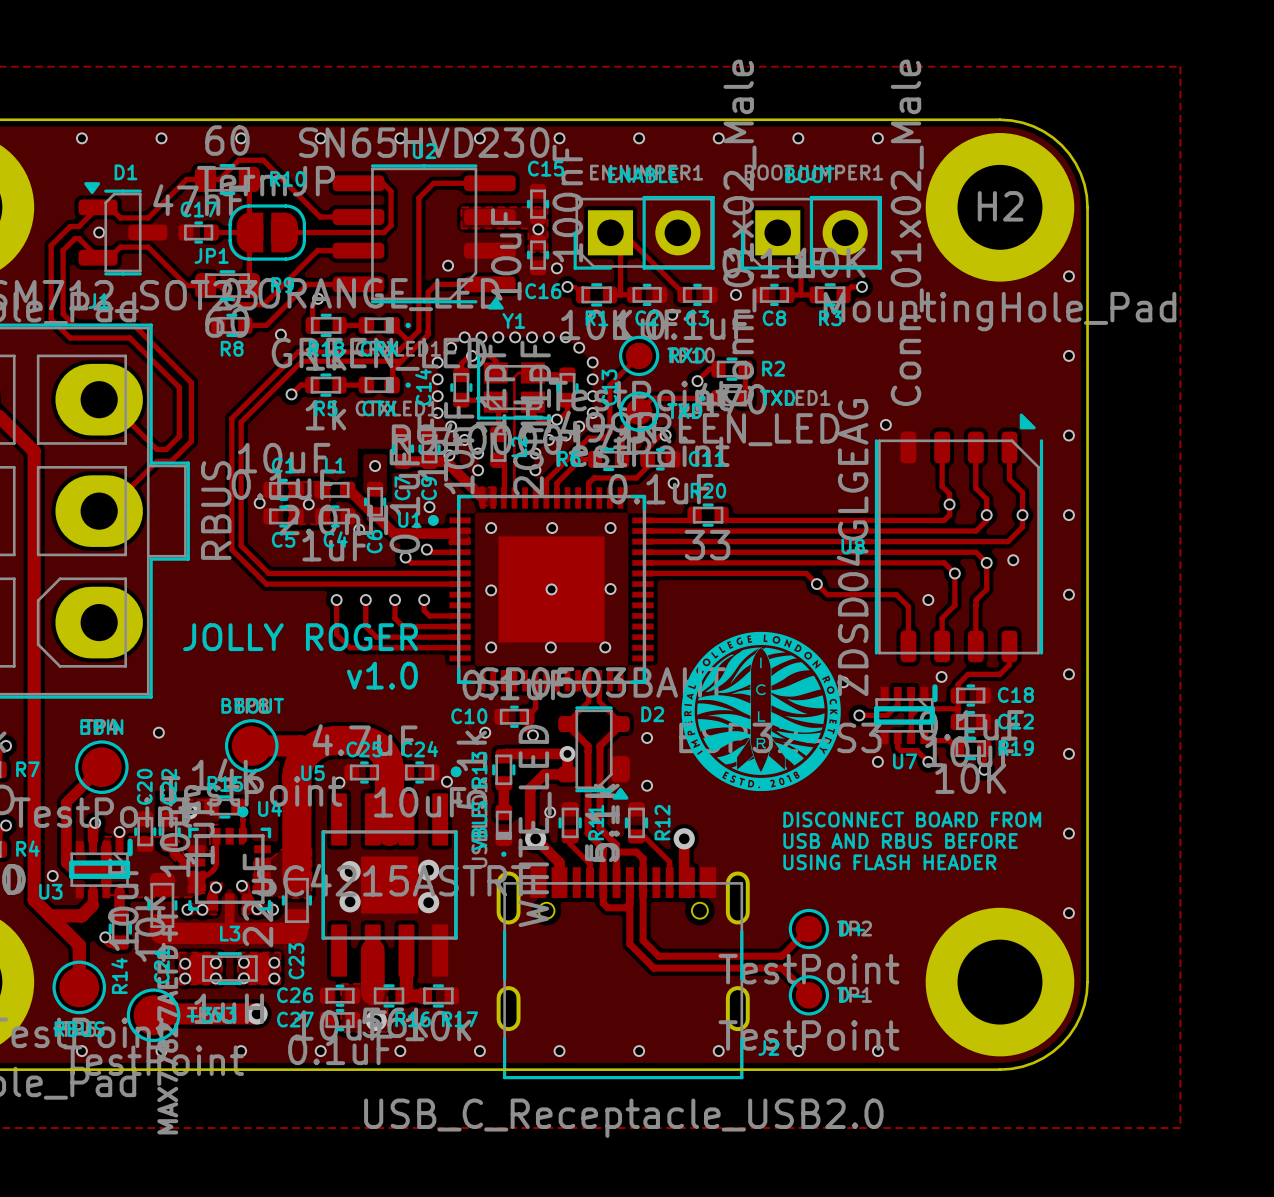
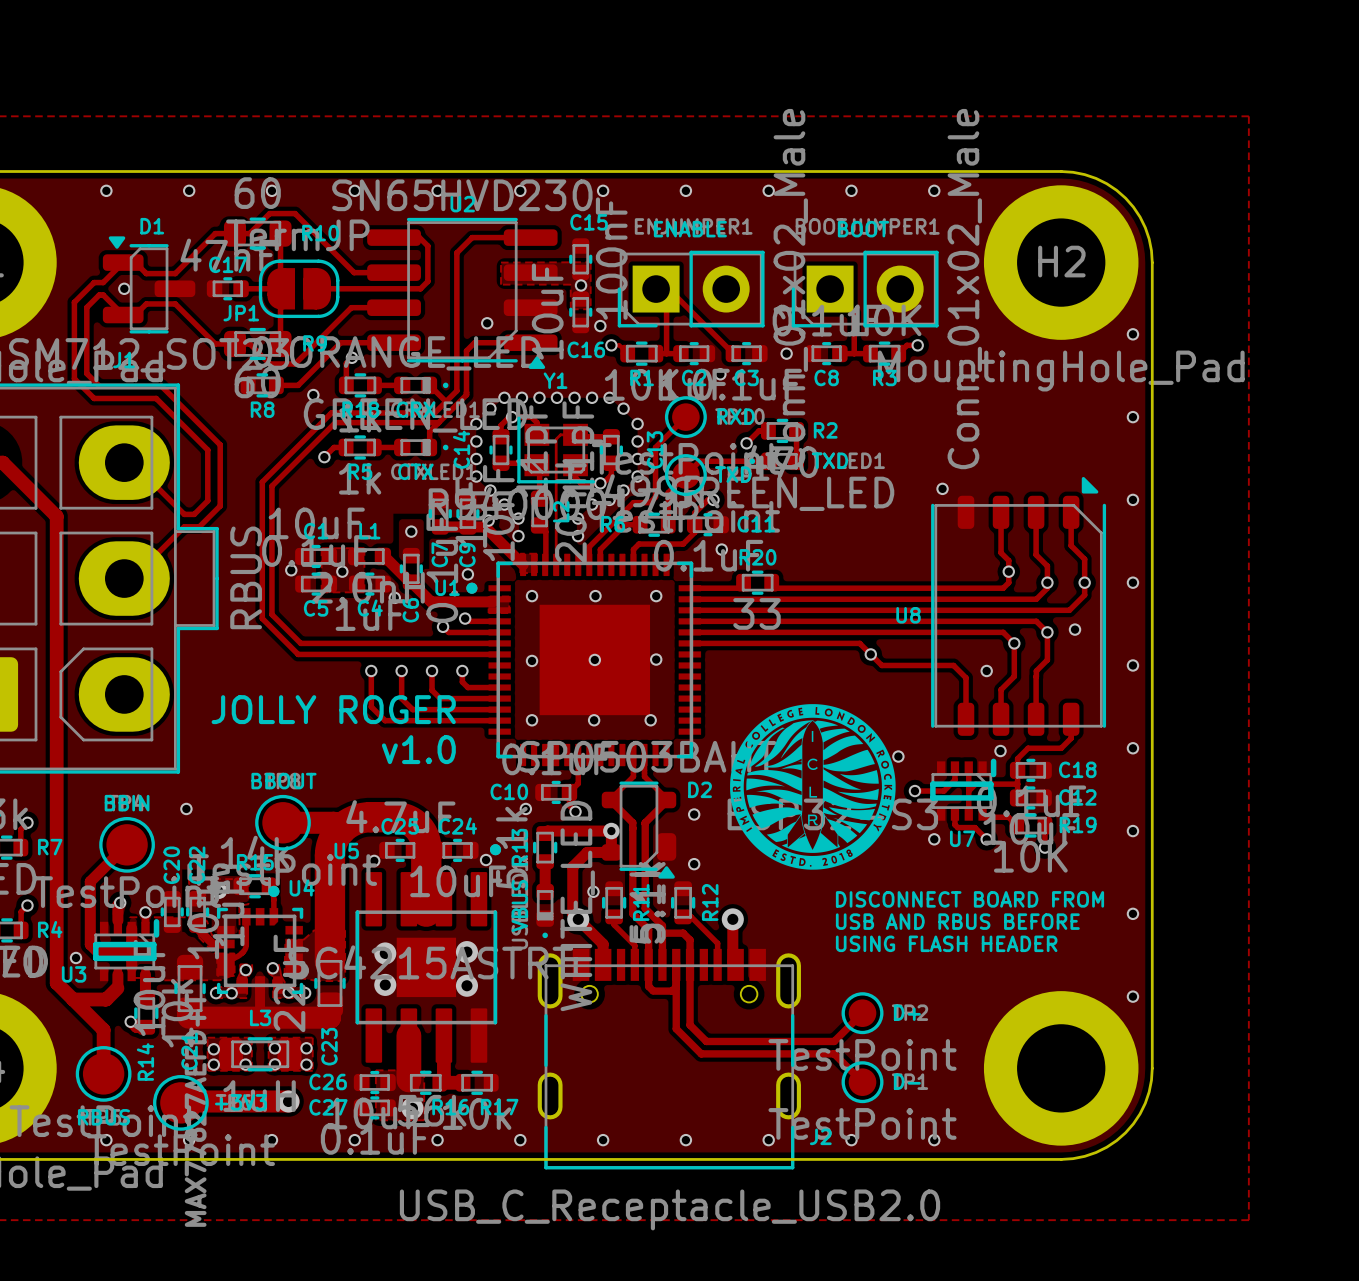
U8 value: ZDSD04GLGEAG (852, 547) -> none

